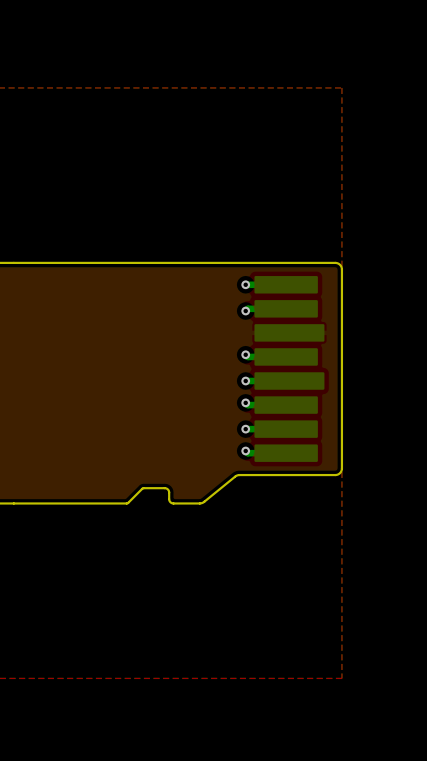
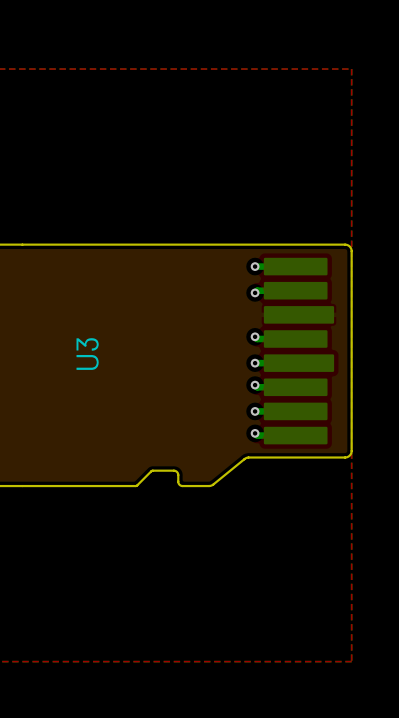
U3 name: none -> U3 (87, 354)

